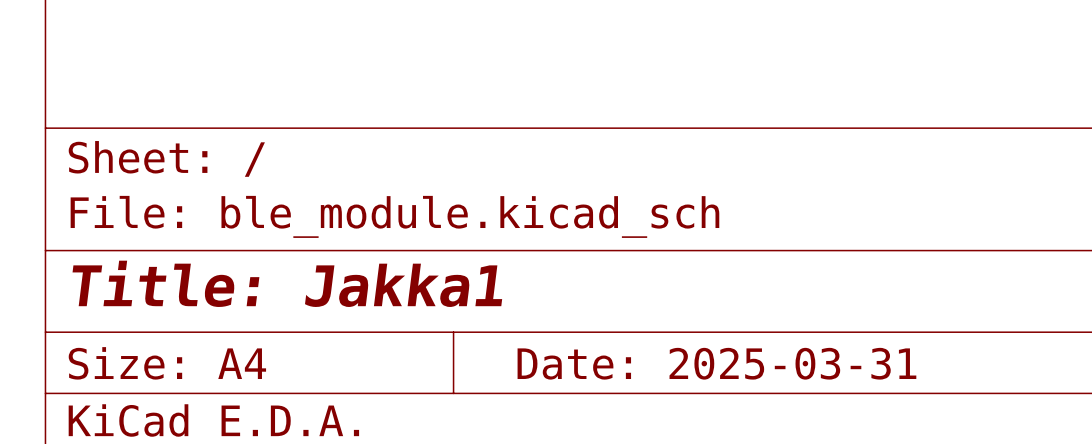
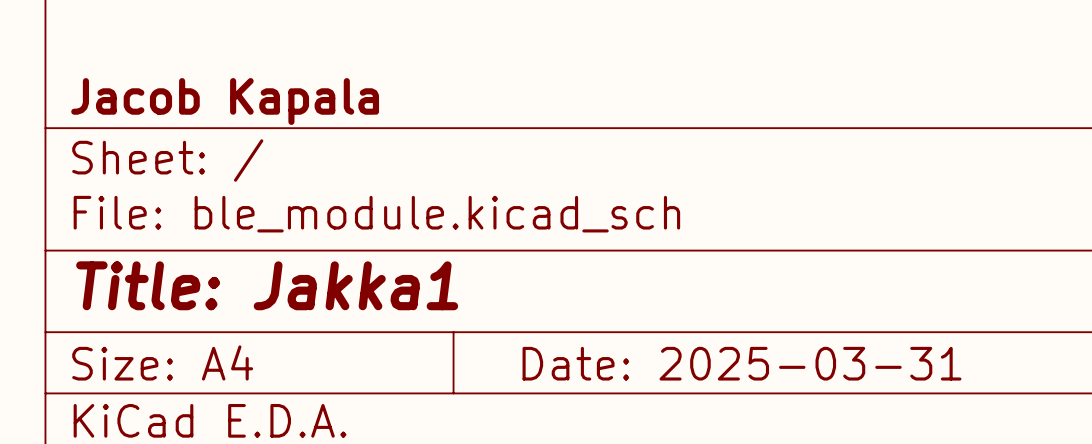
title block: none -> Jacob Kapala (225, 101)

